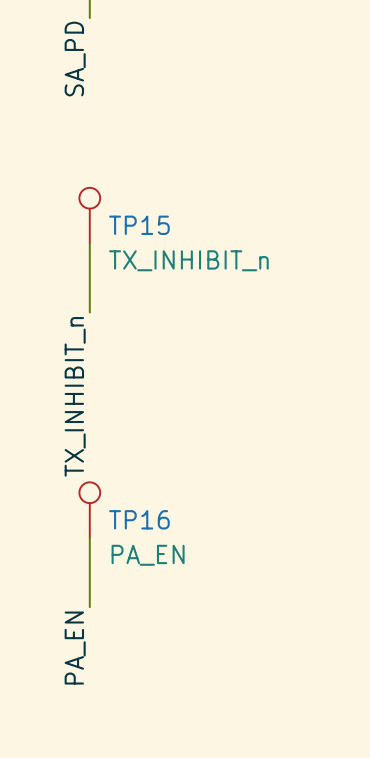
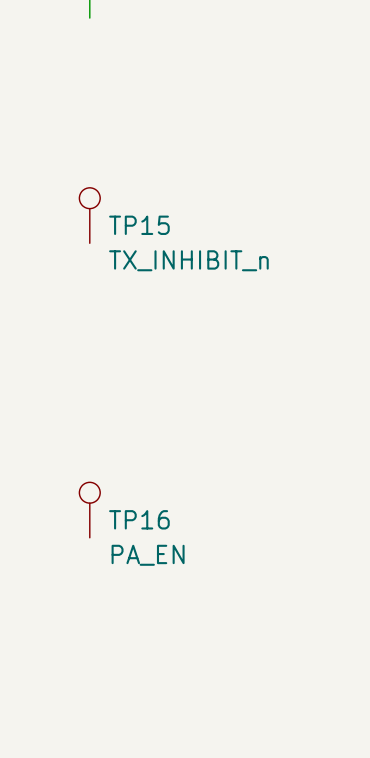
label: SA_PD (75, 59) -> none
wire: (89, 243) (89, 312) -> none
label: TX_INHIBIT_n (75, 396) -> none
wire: (89, 537) (89, 607) -> none
label: PA_EN (75, 648) -> none

